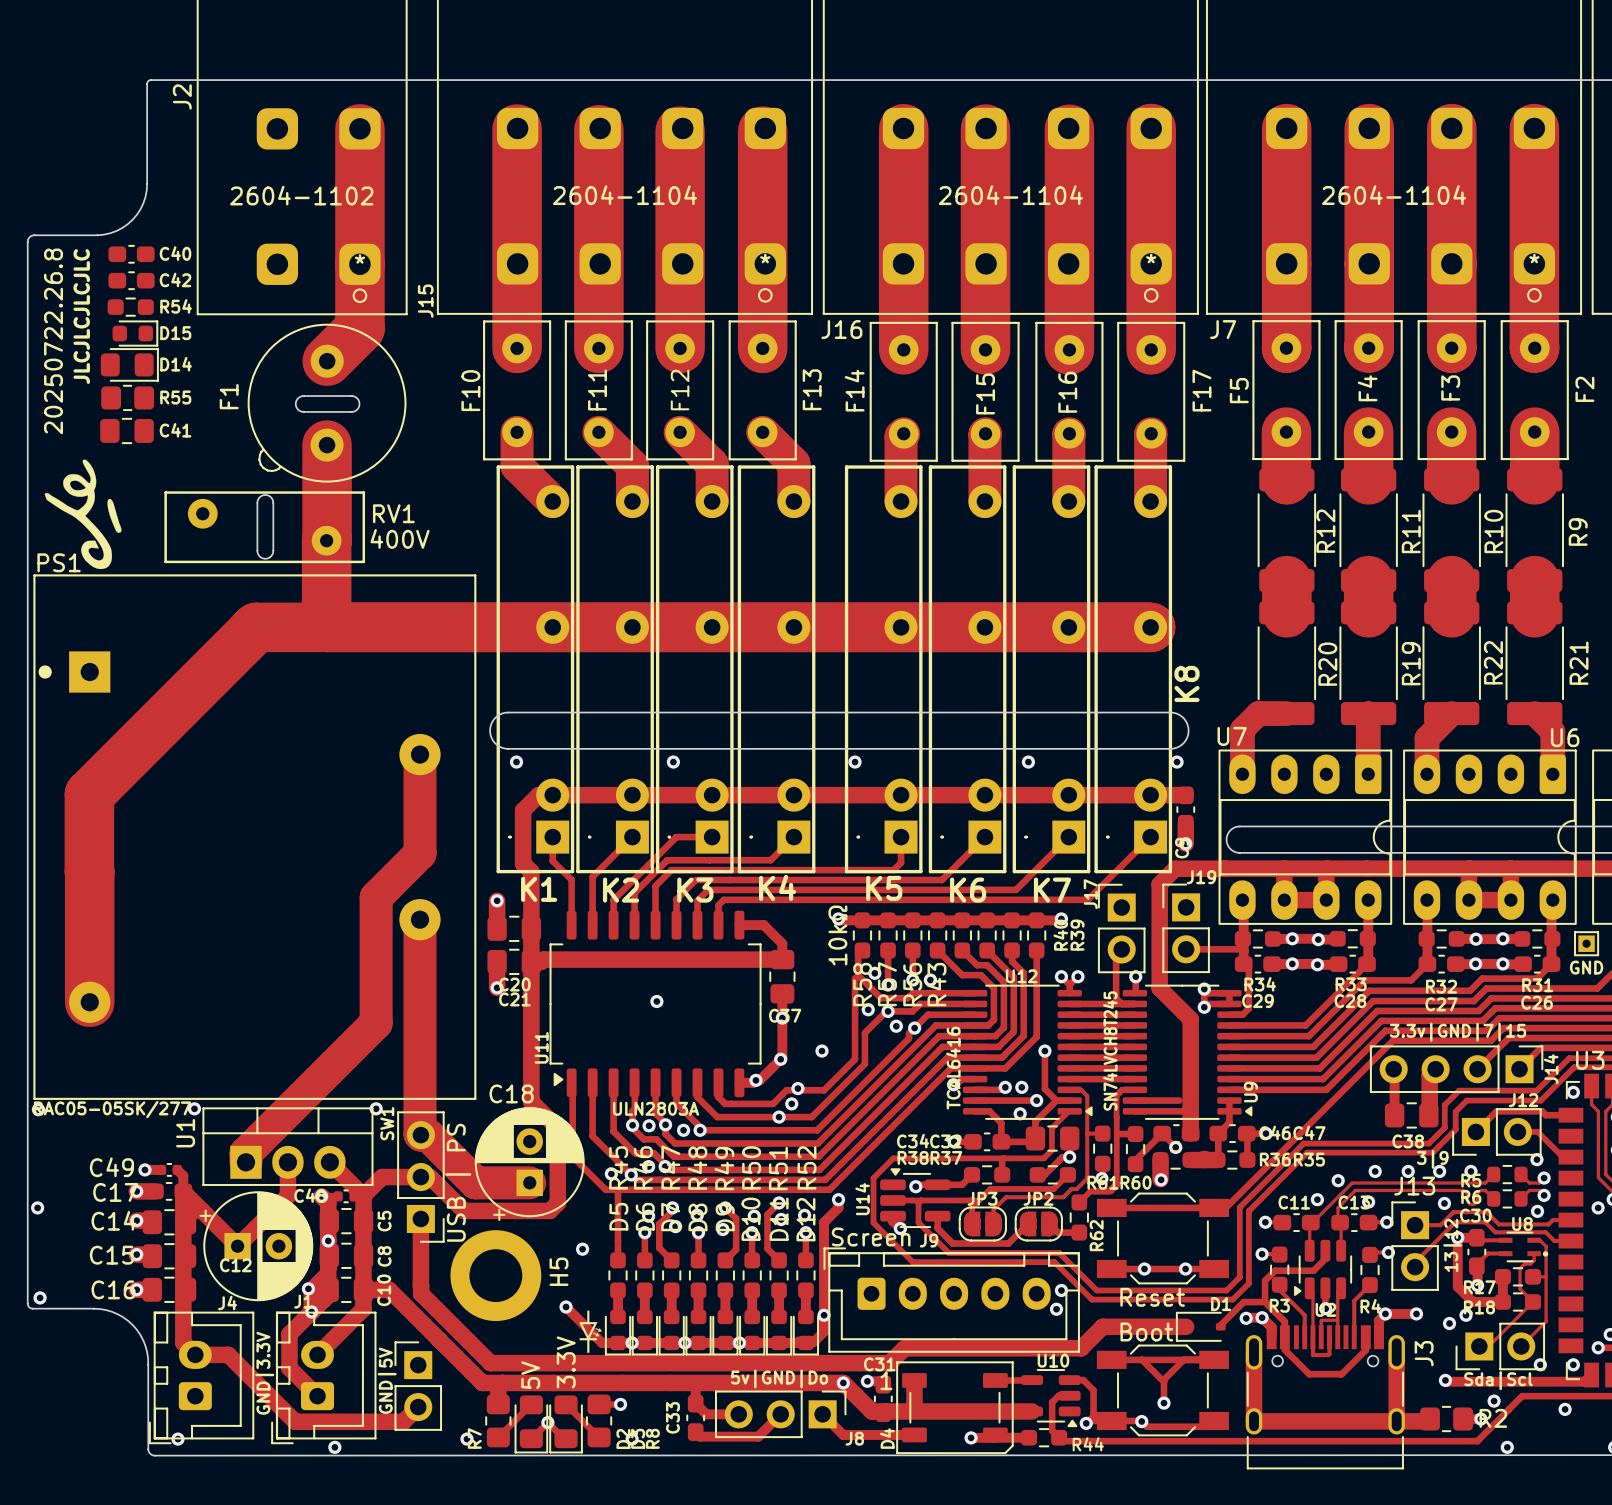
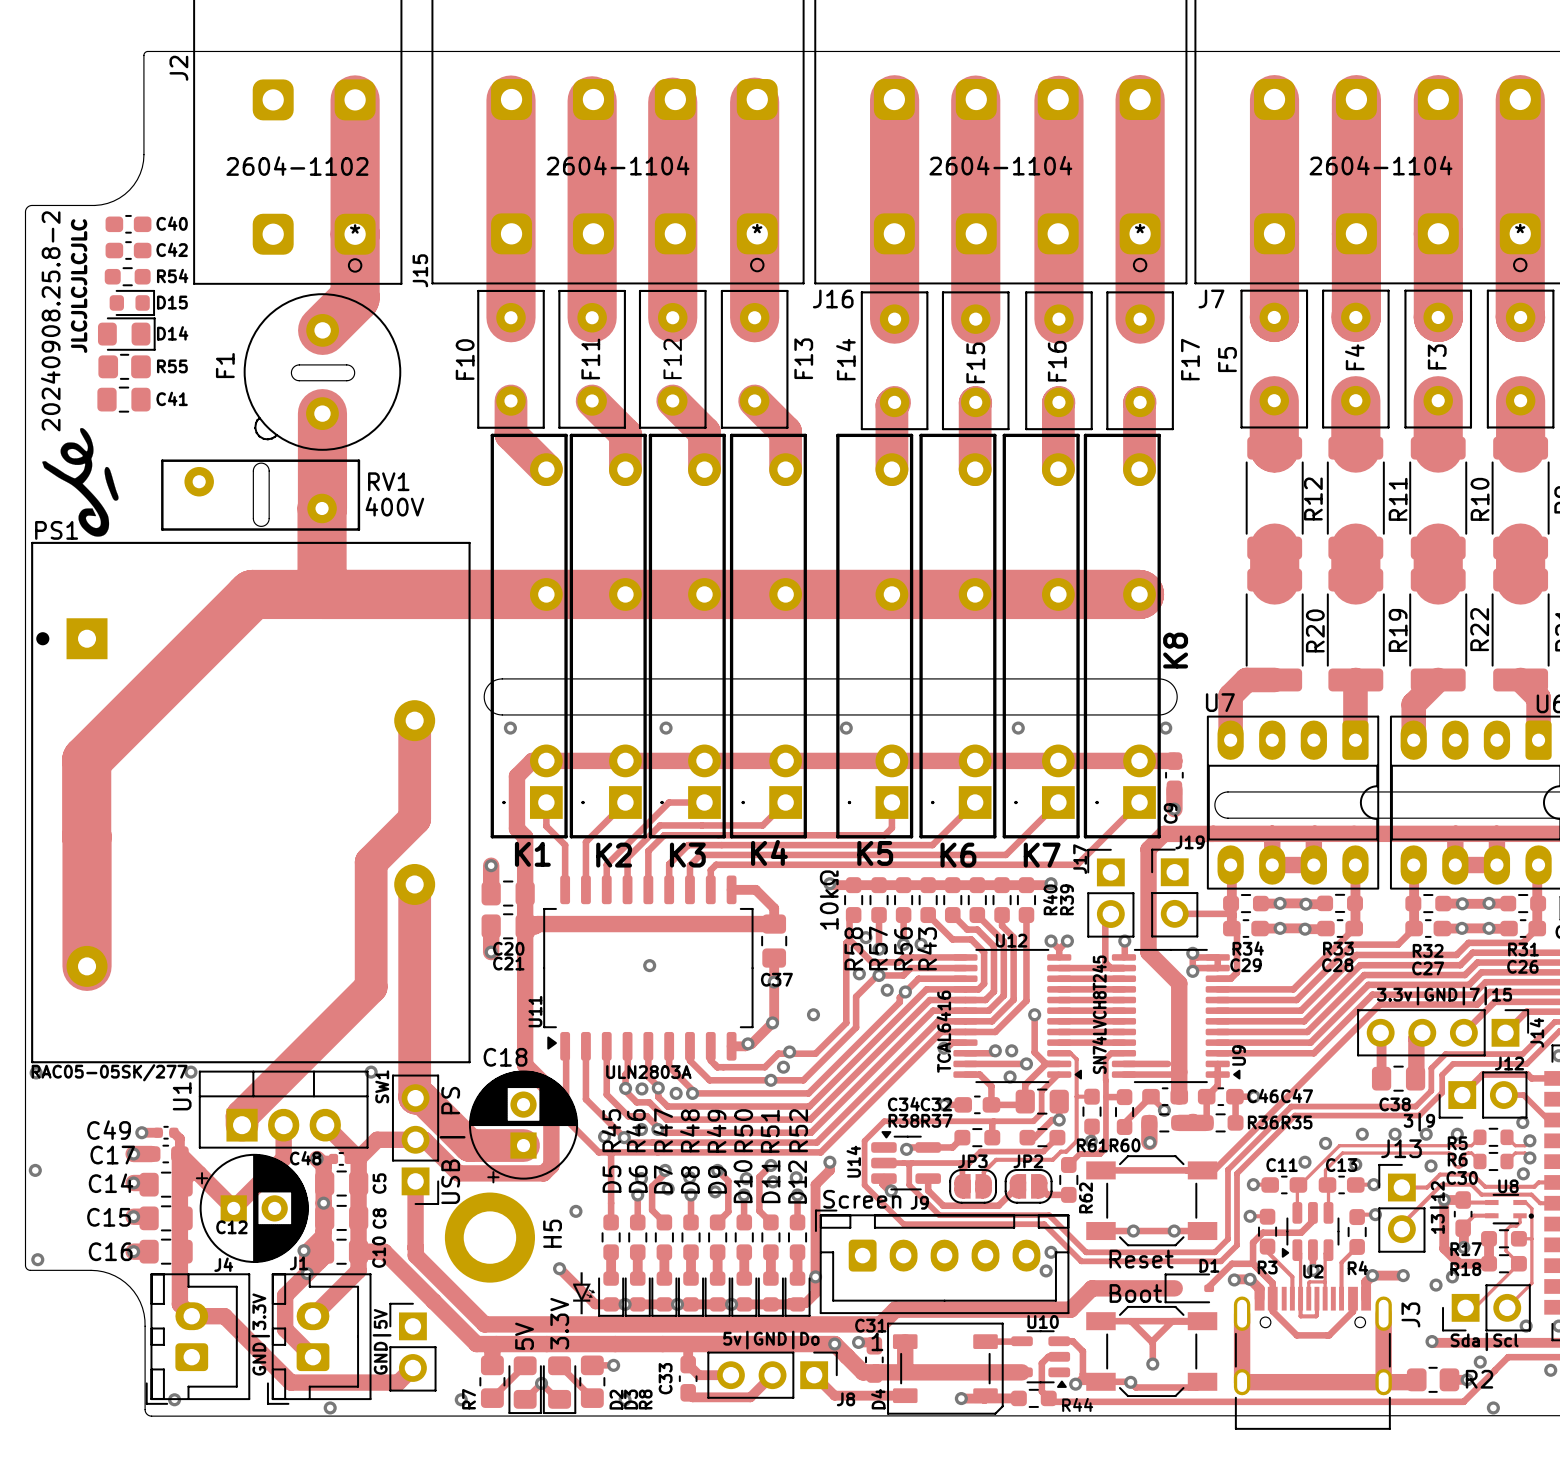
text: 20250722.26.8 (53, 341) -> 20240908.25.8-2 (50, 321)

